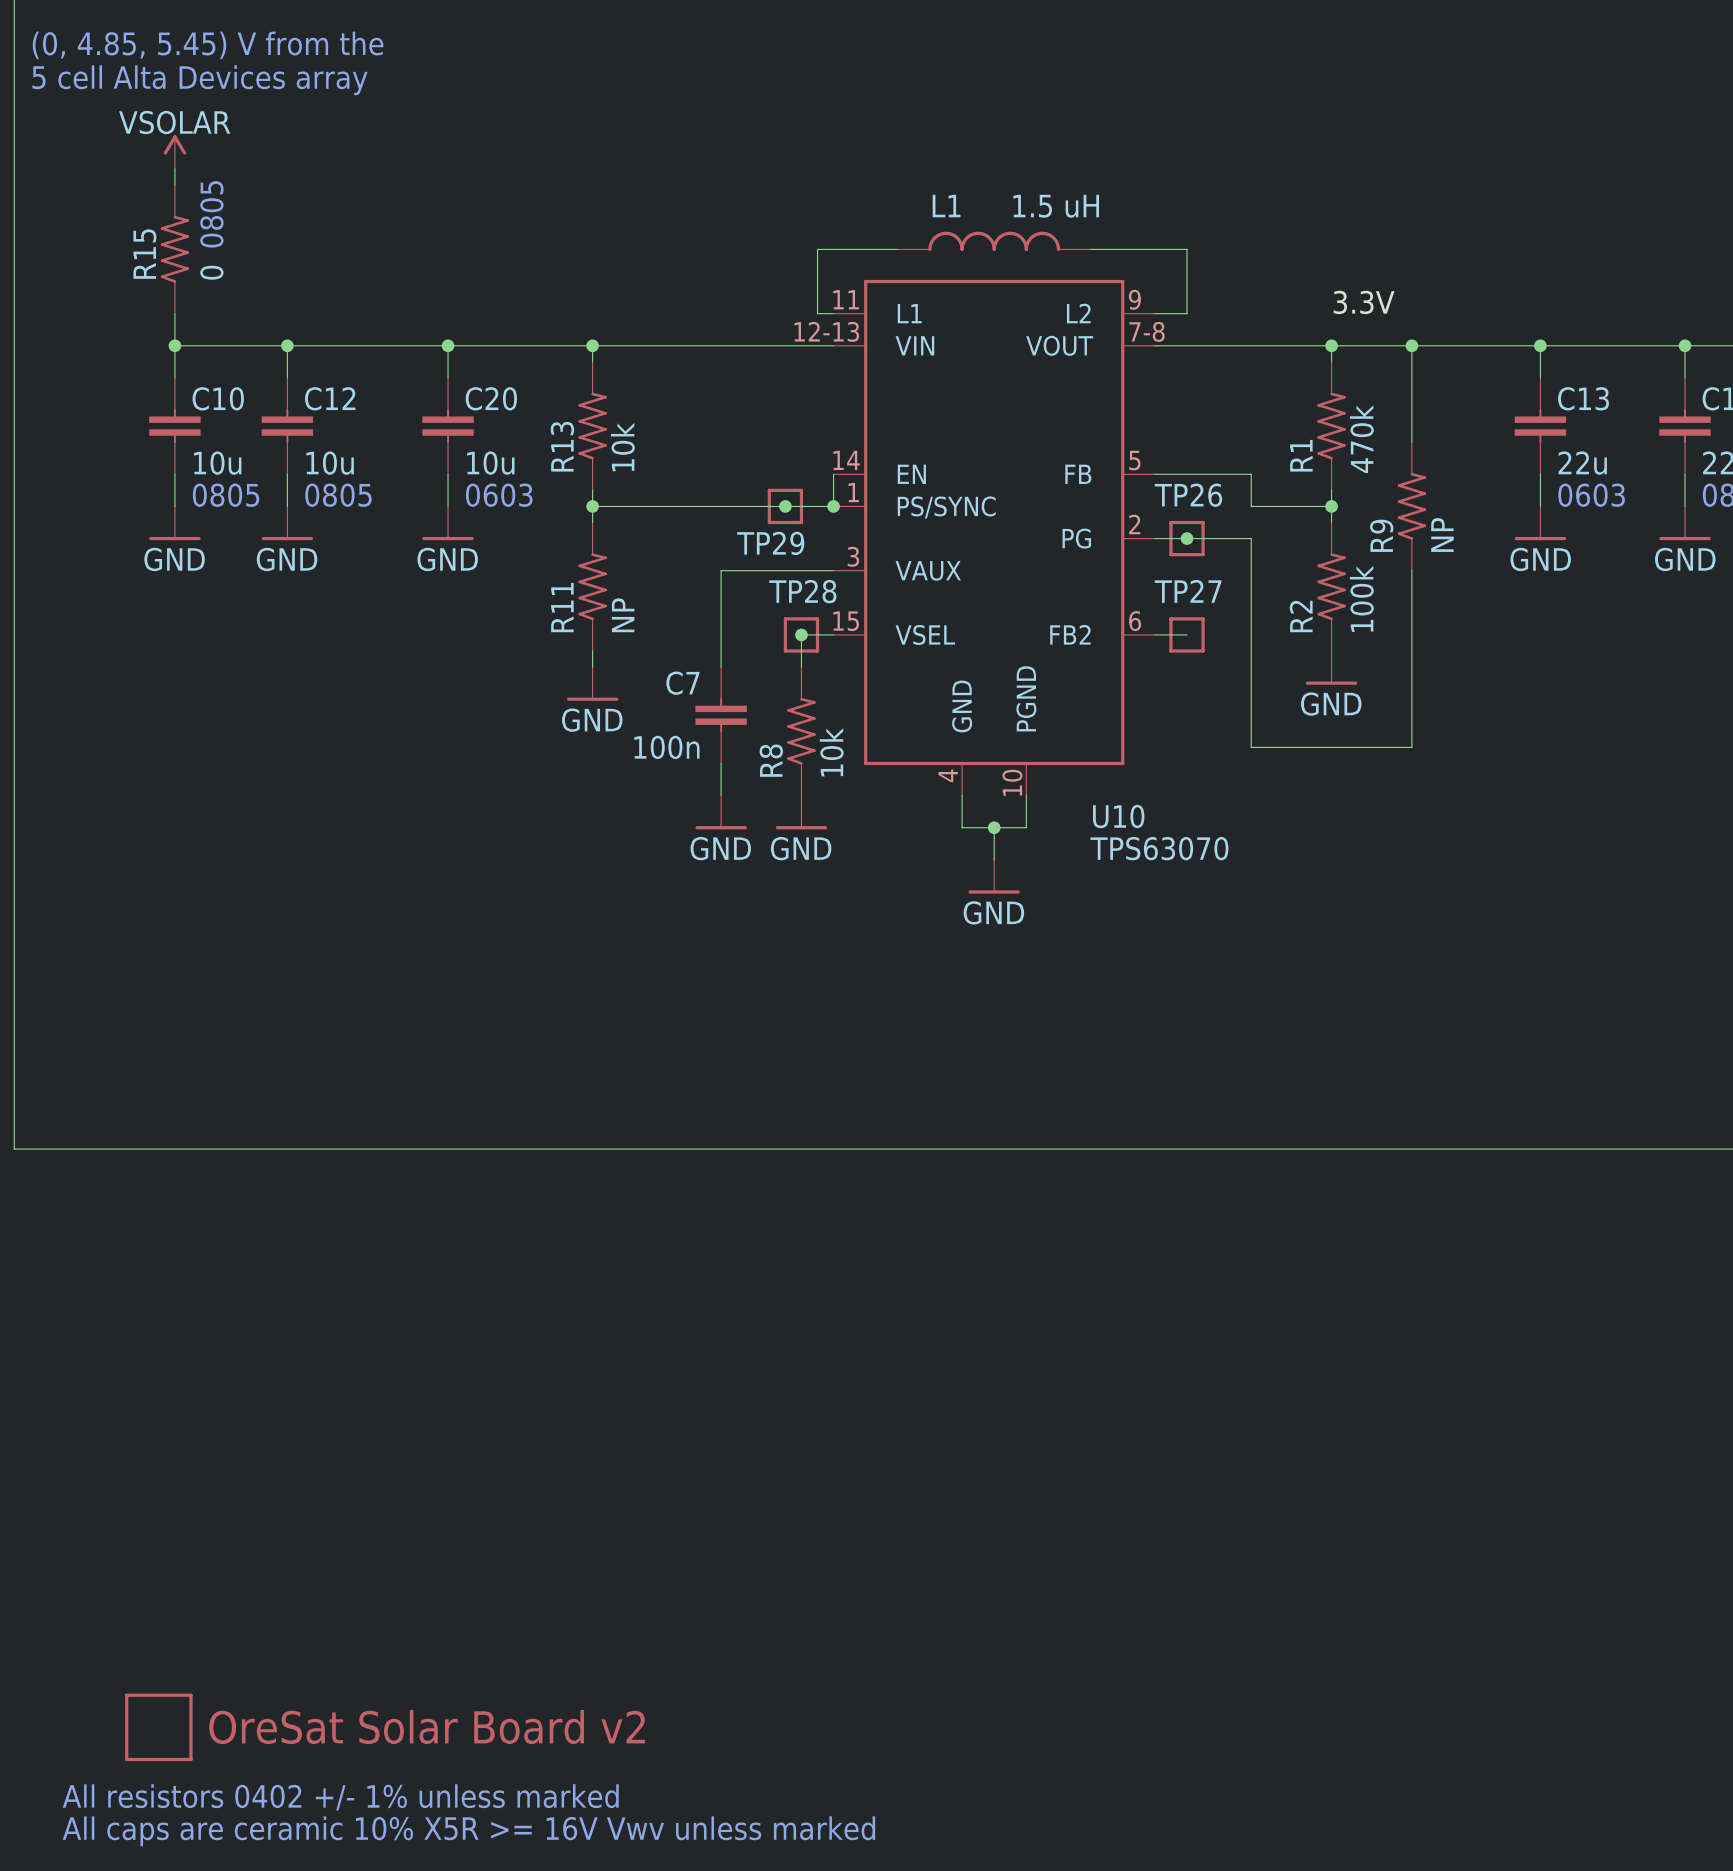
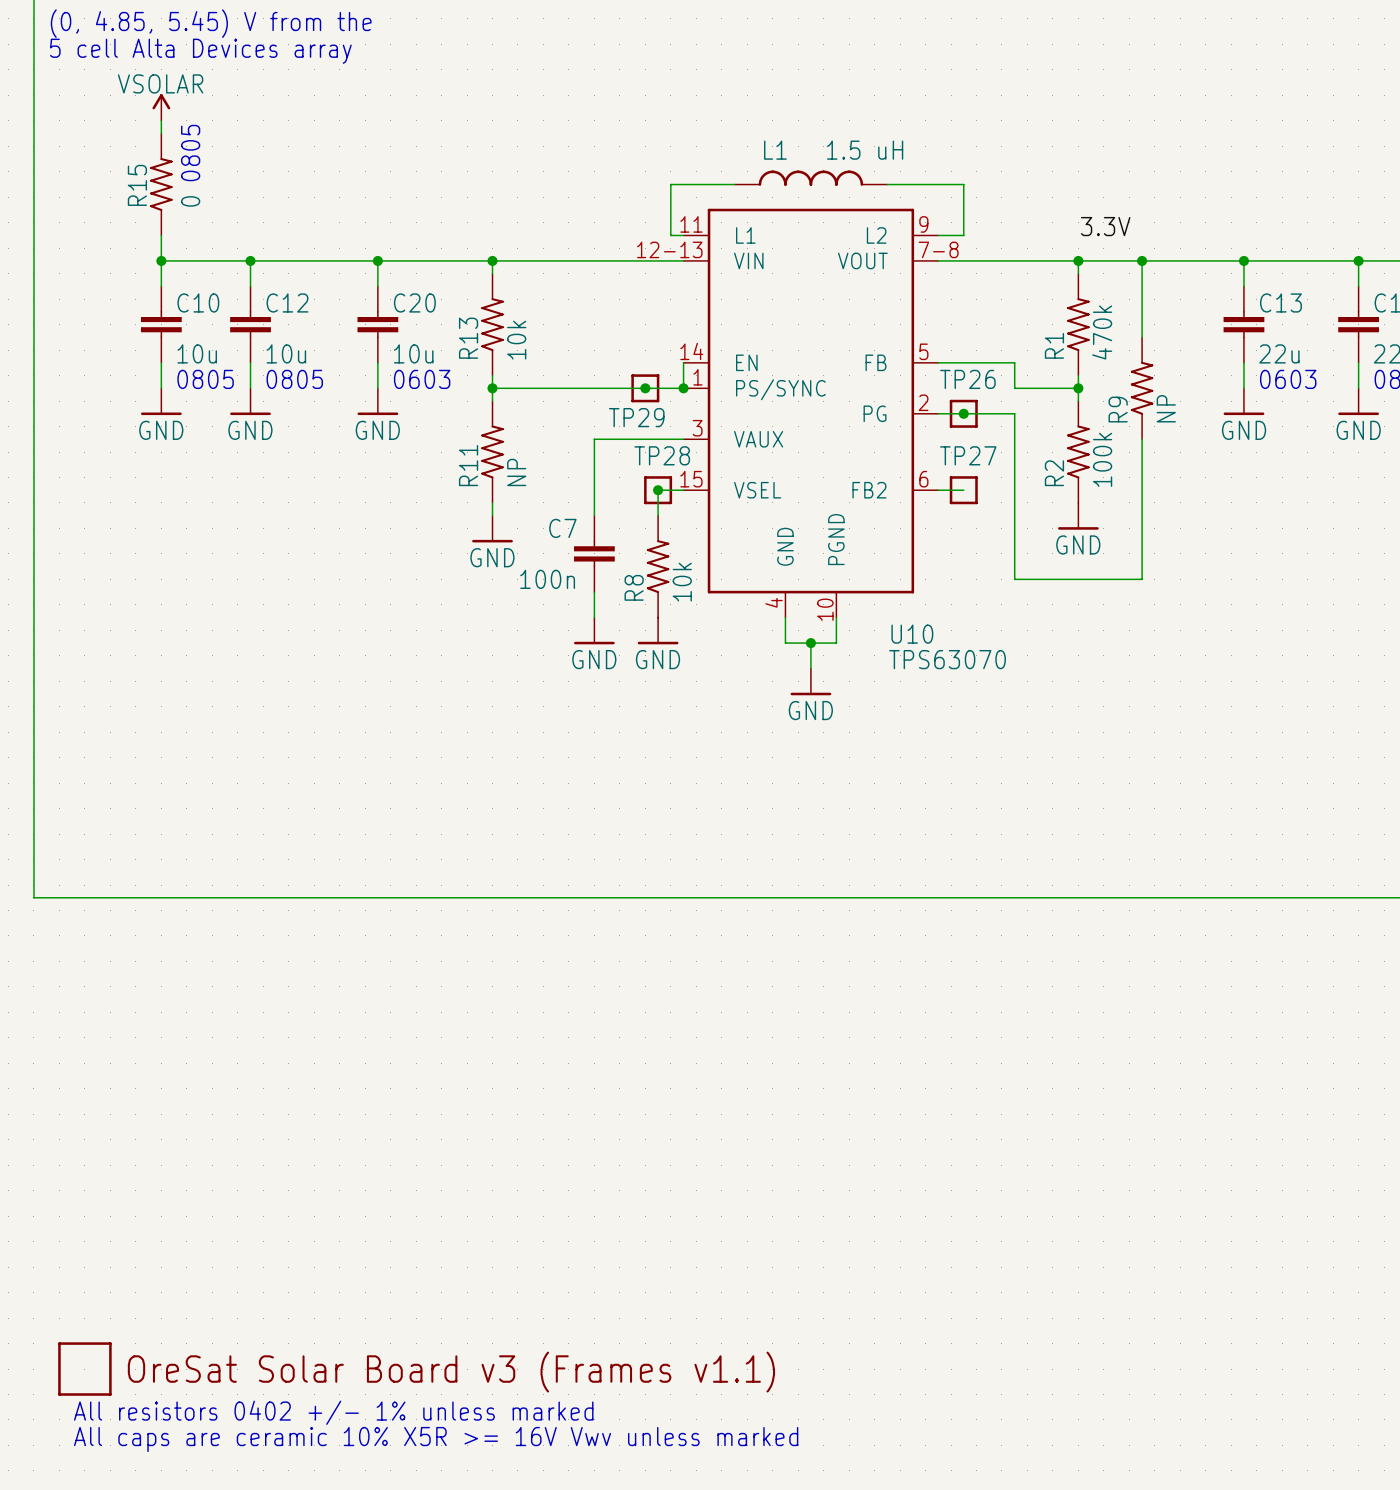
part: (158, 1727) -> none
part: none -> (84, 1369)

